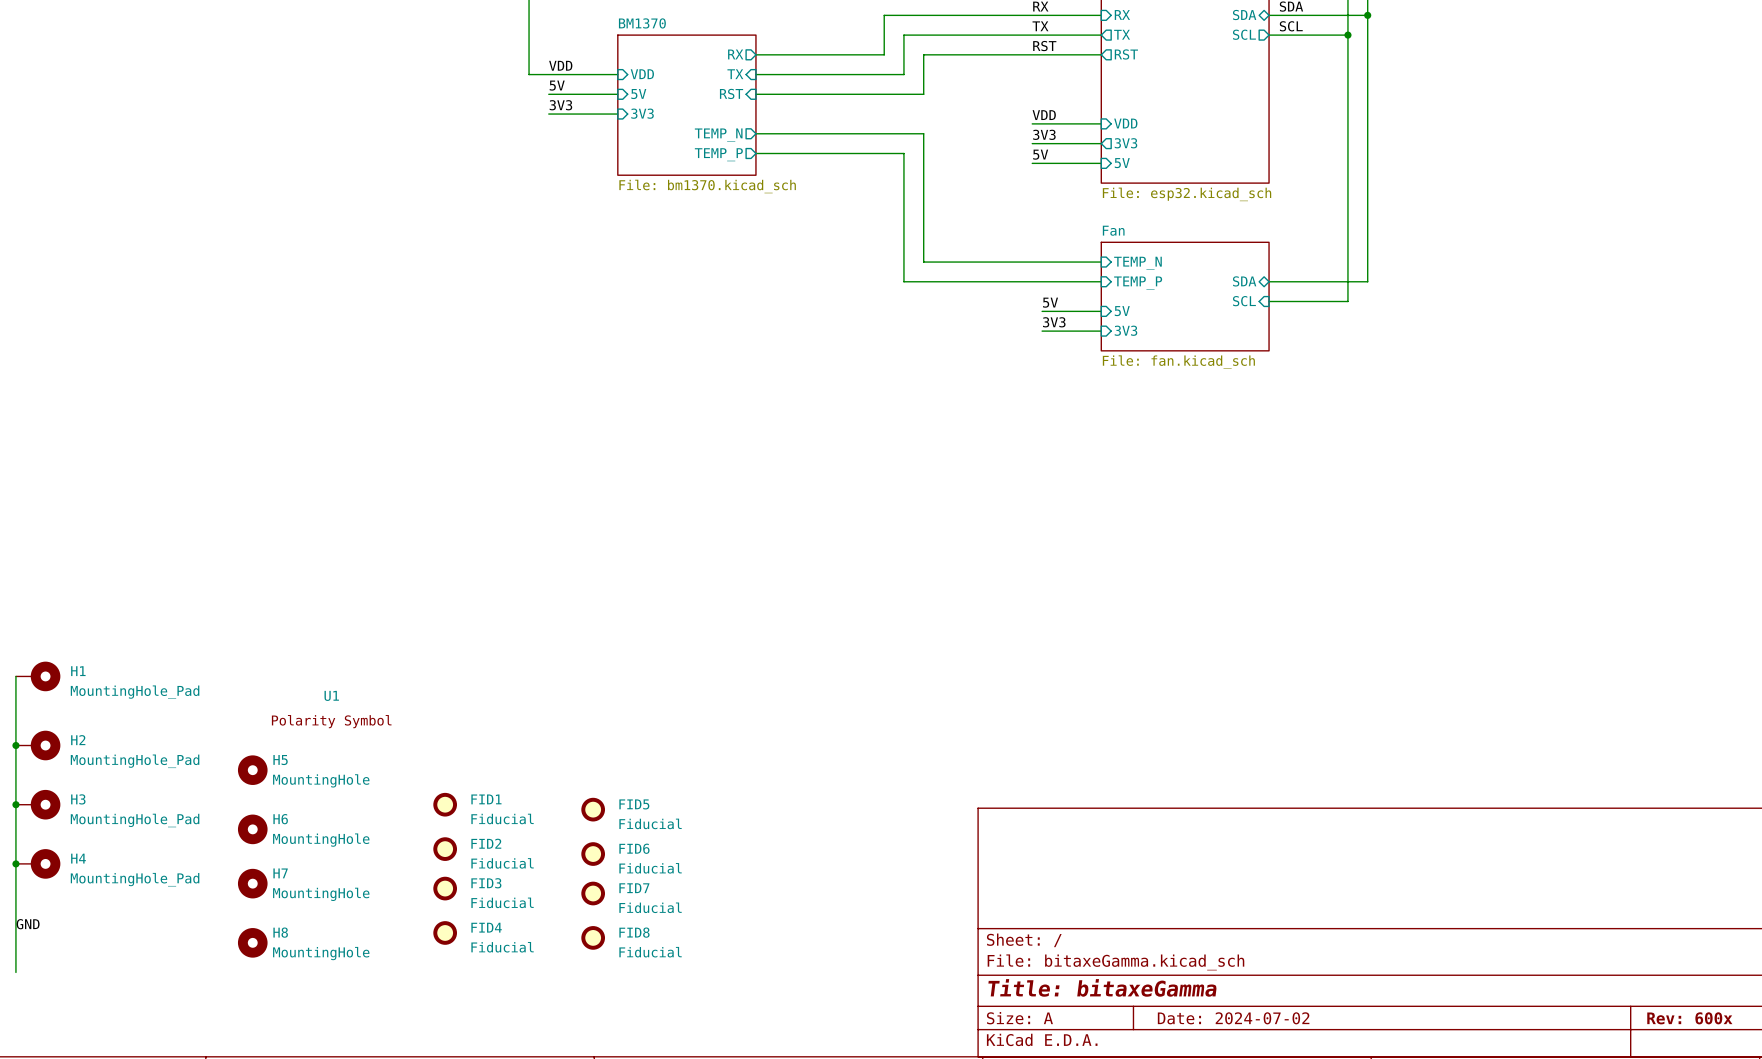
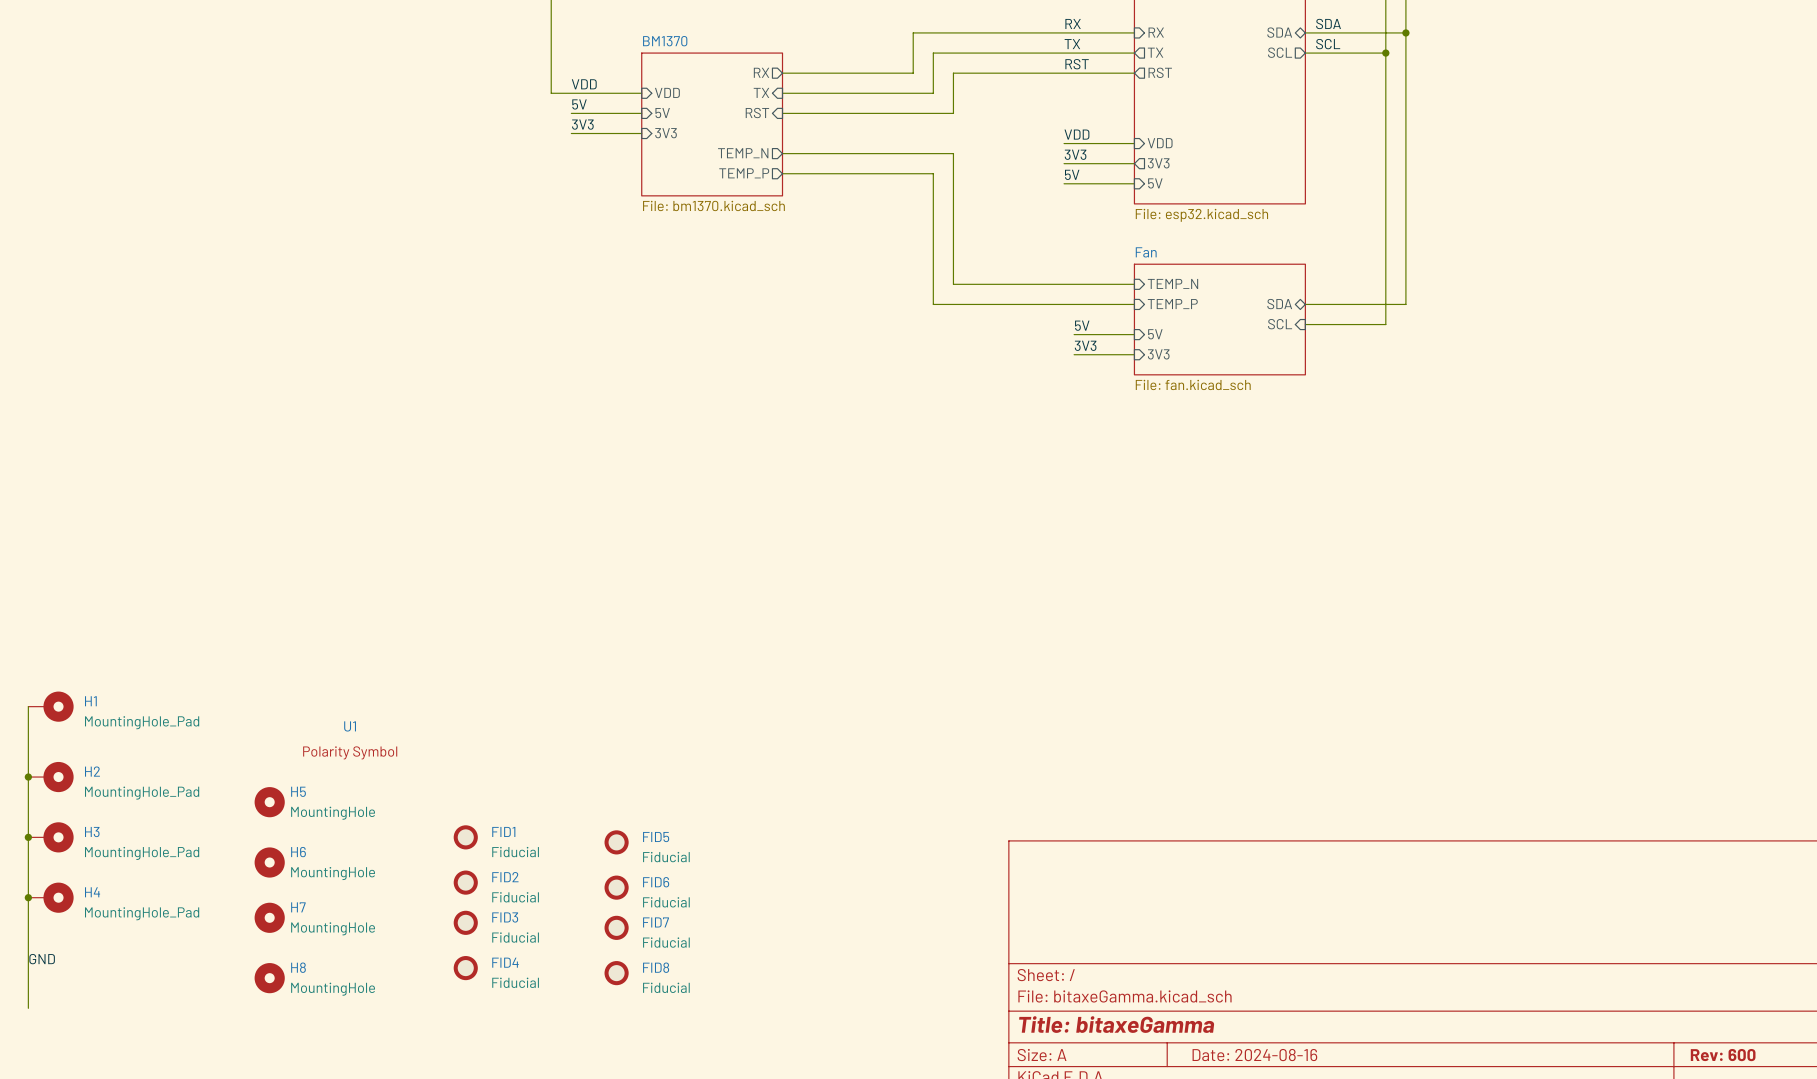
title block: Date: 2024-07-02 (1233, 1018) -> Date: 2024-08-16 (1254, 1055)
title block: Rev: 600x (1689, 1018) -> Rev: 600 (1723, 1055)

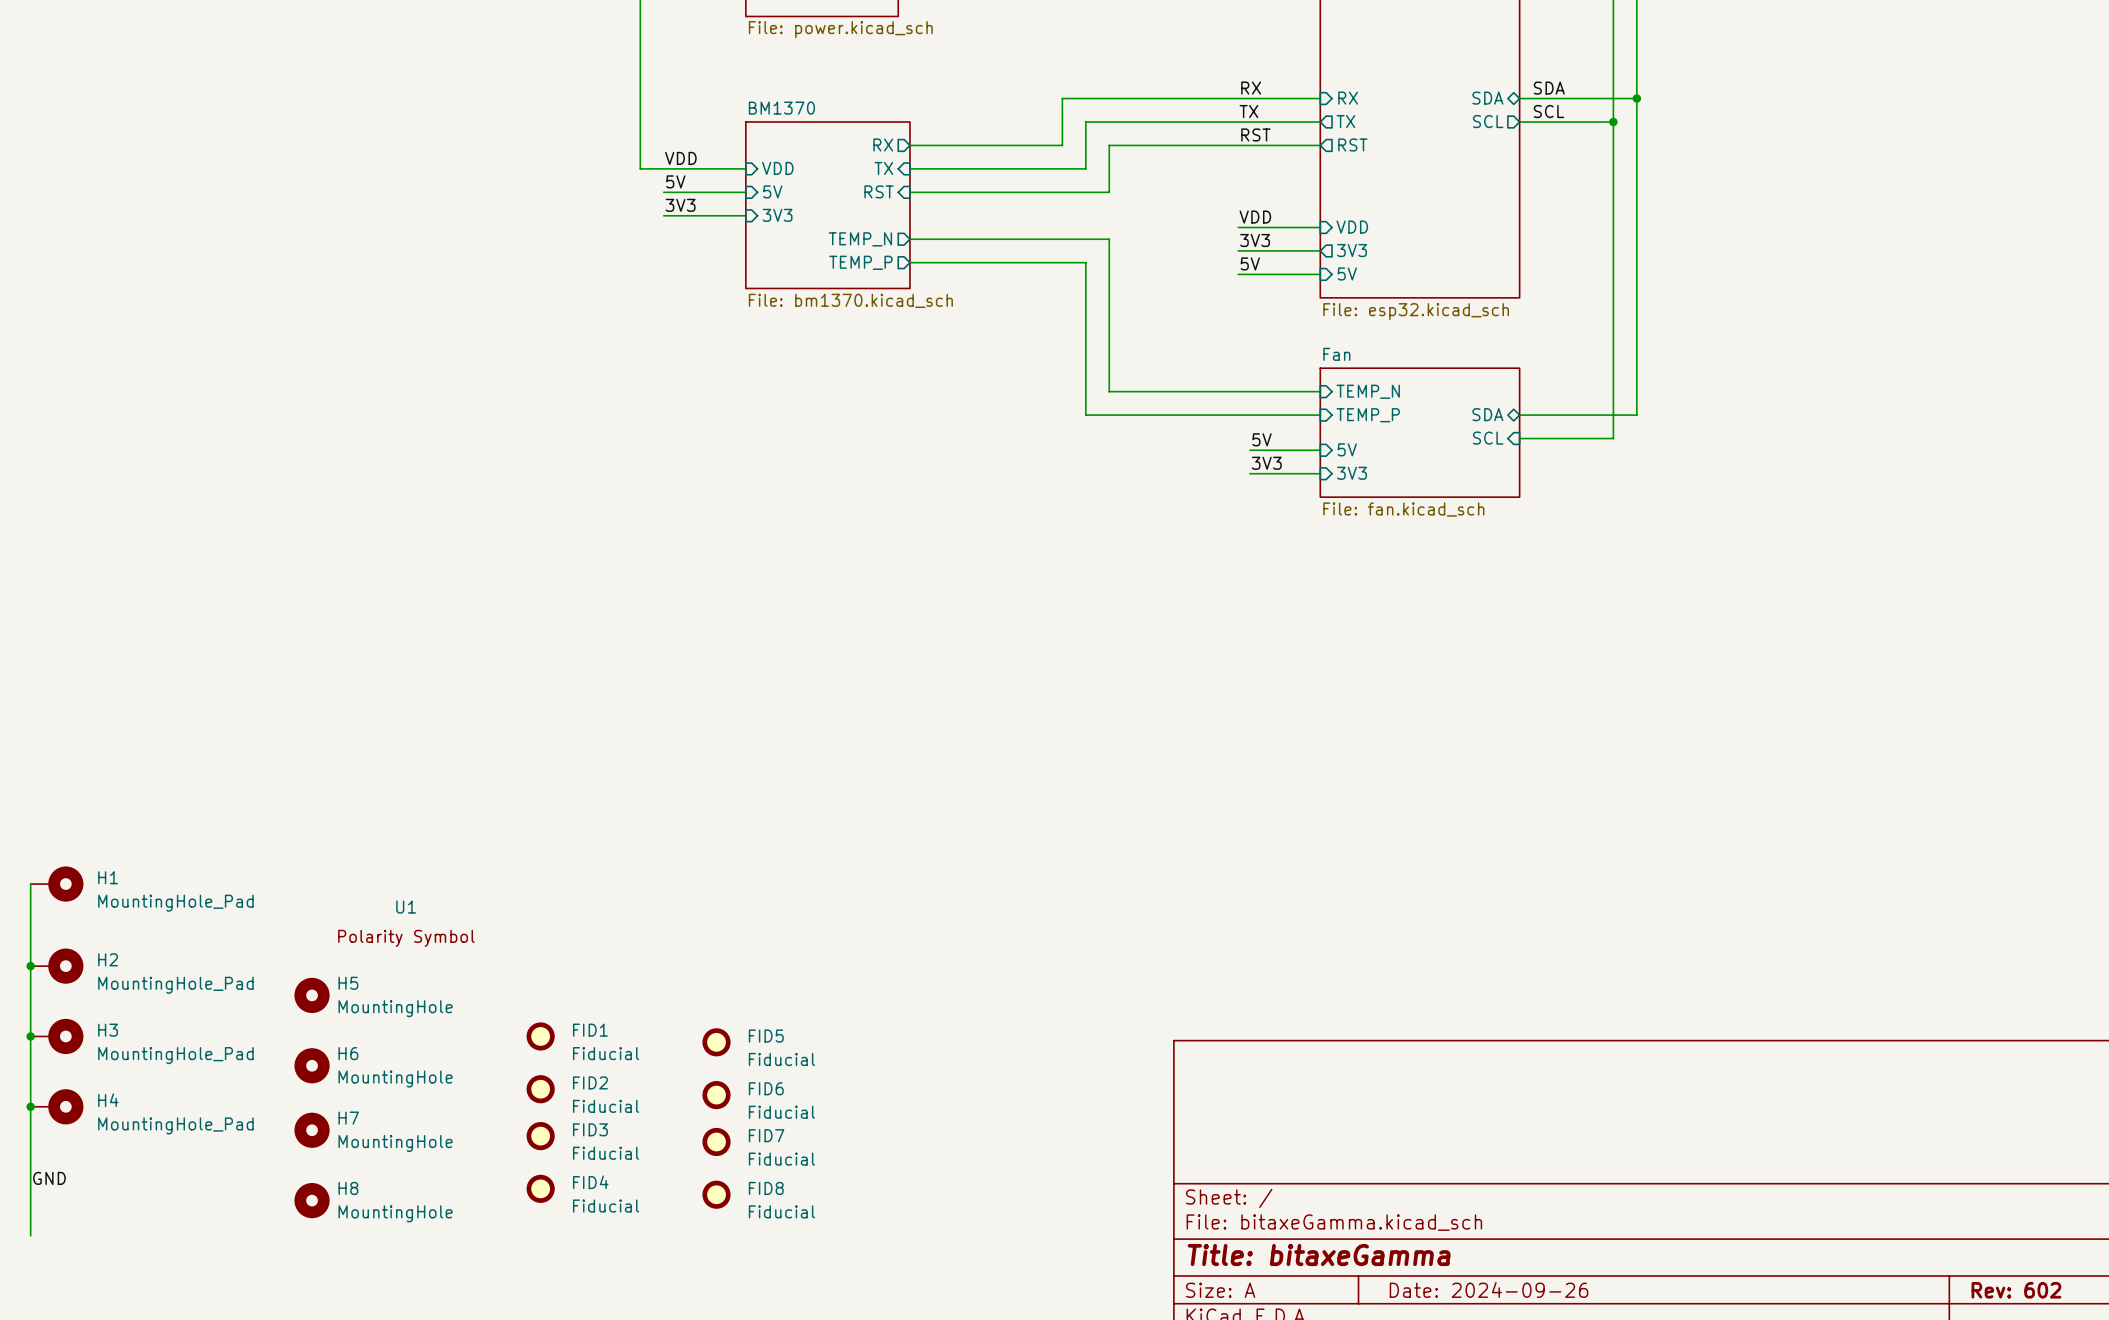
title block: Date: 2024-08-16 (1254, 1055) -> Date: 2024-09-26 (1489, 1289)
title block: Rev: 600 (1723, 1055) -> Rev: 602 (2016, 1290)

